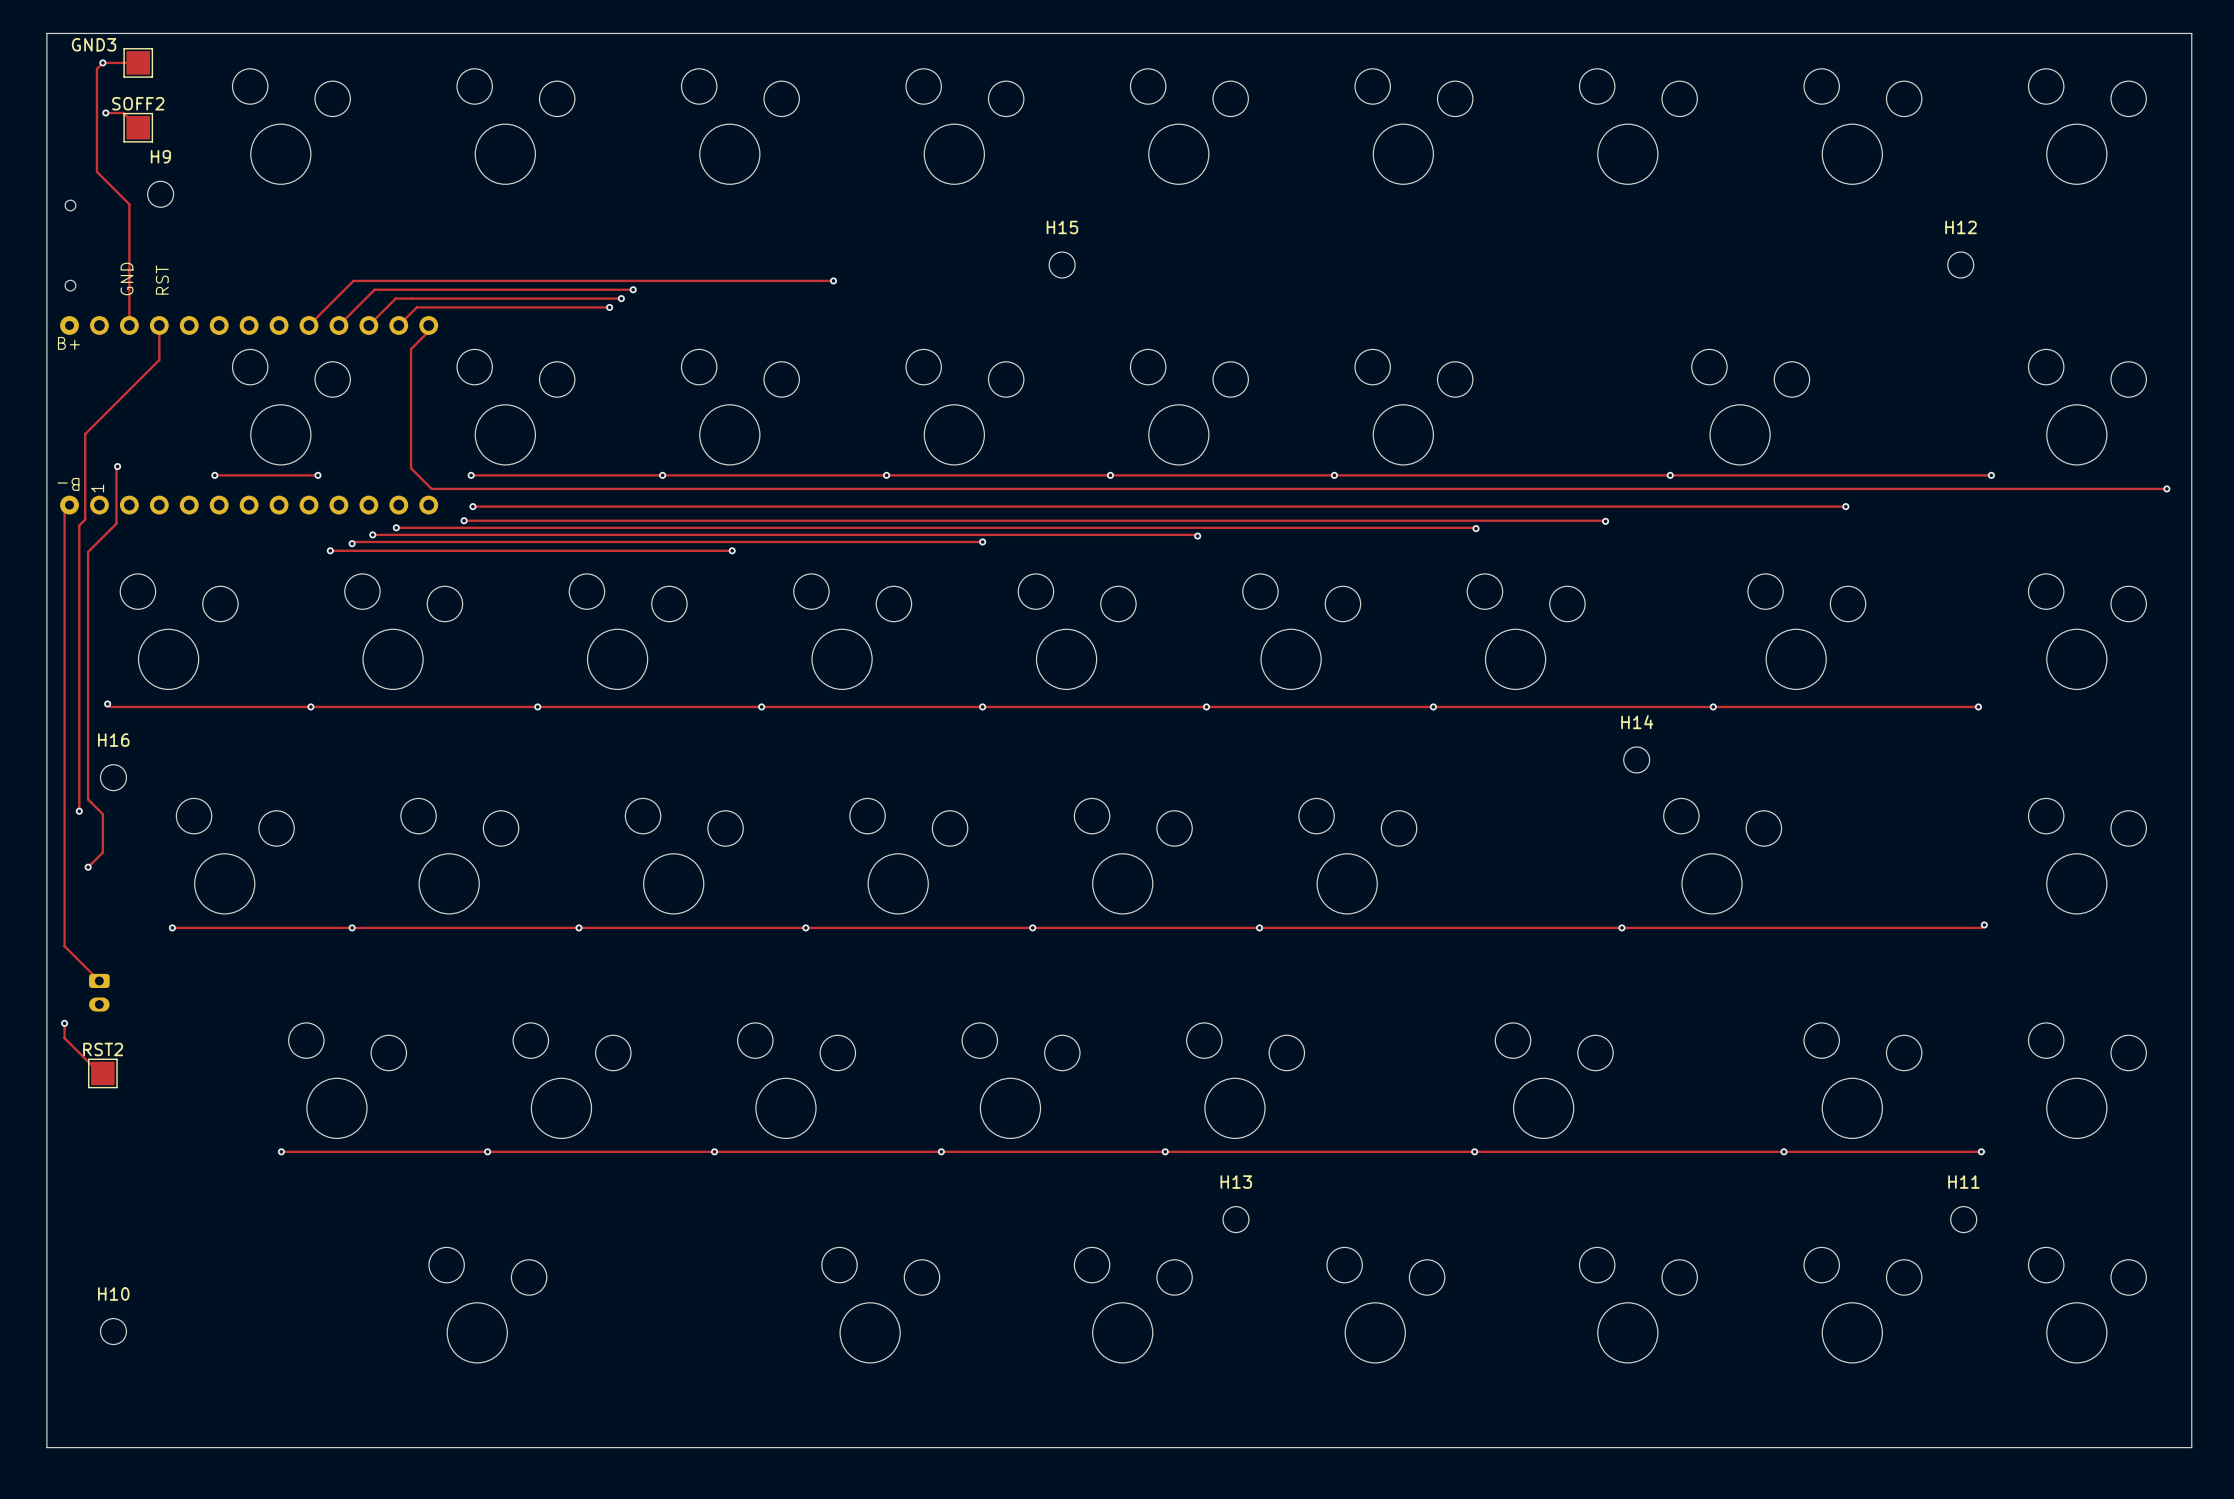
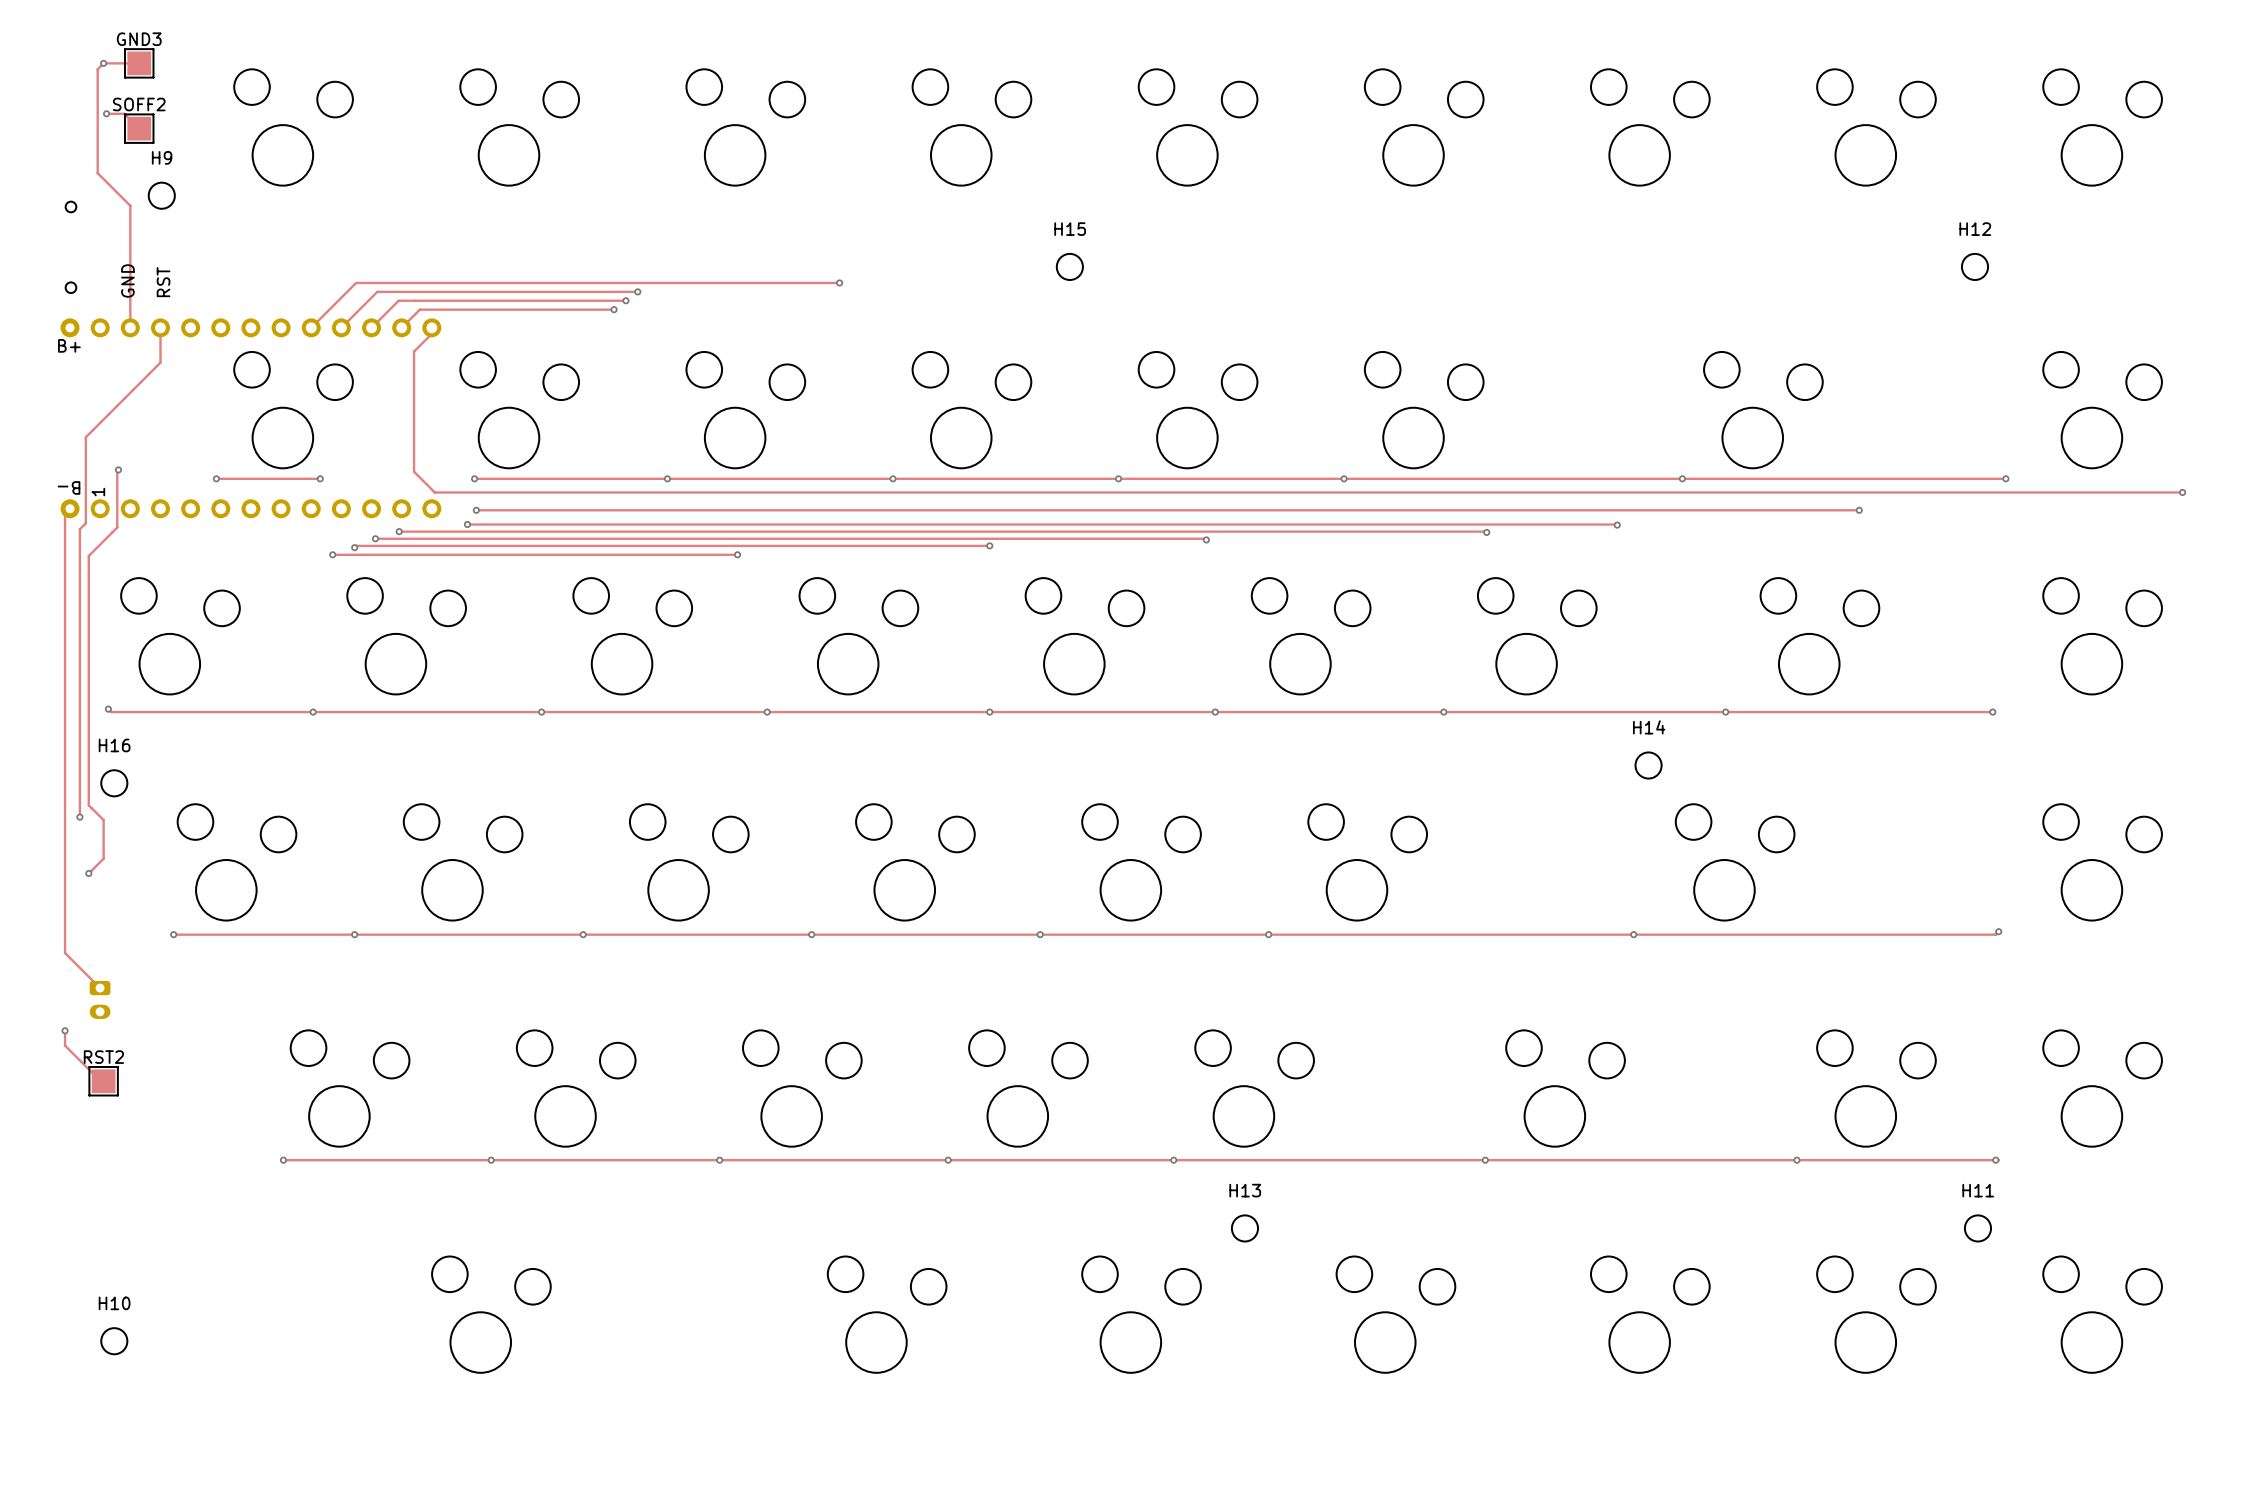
board edge: (46, 33) (2191, 33) (2191, 1447) (46, 1447) (46, 33) -> none
GND3 name position: GND3 (94, 44) -> GND3 (139, 39)

